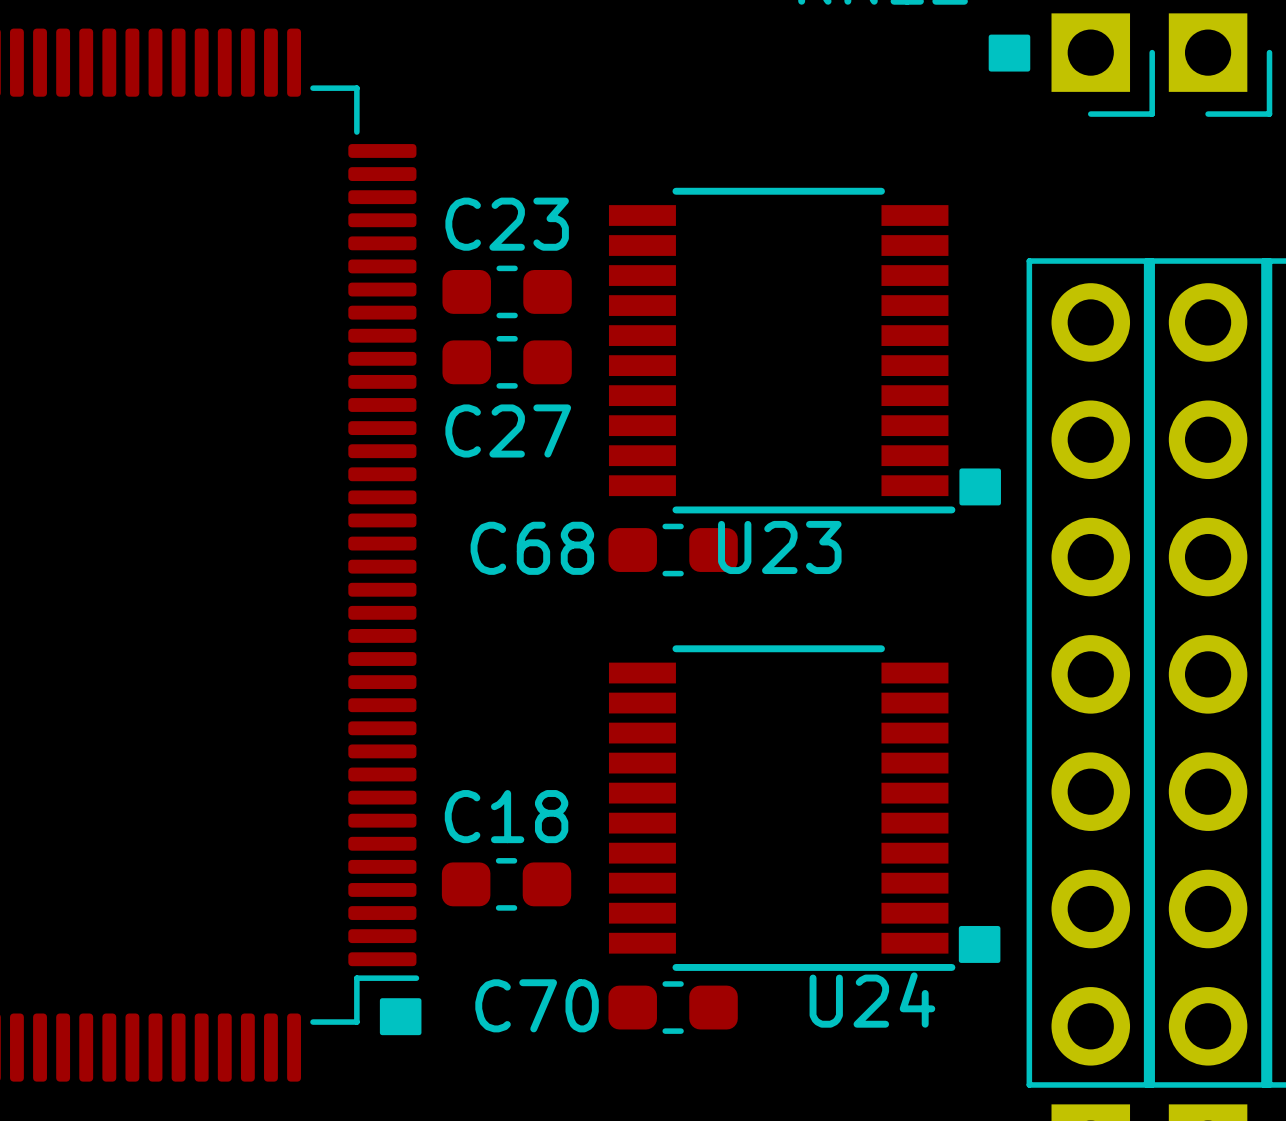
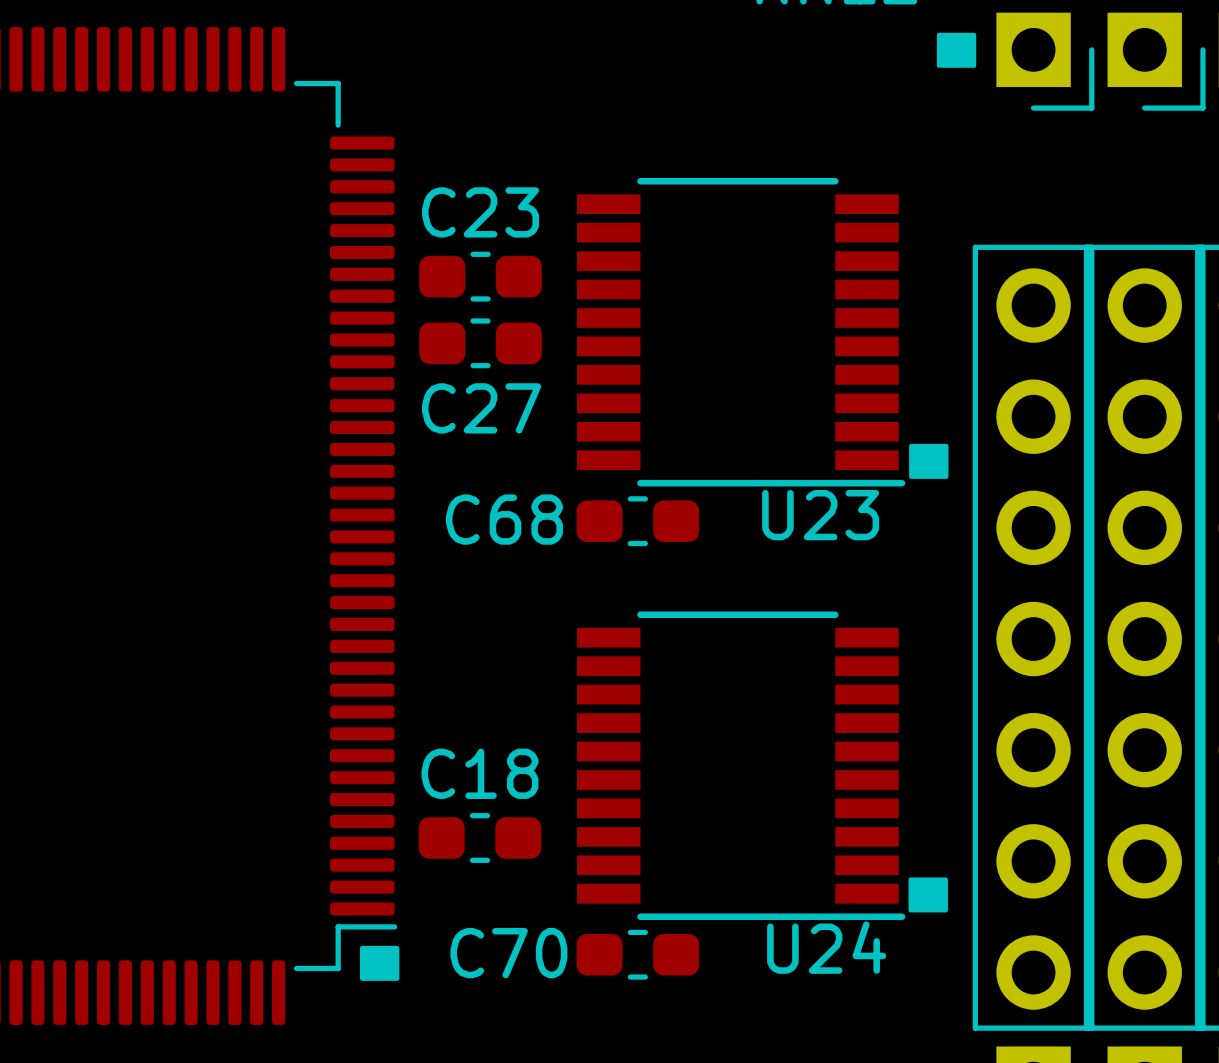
U23 name position: U23 (779, 547) -> U23 (820, 515)

